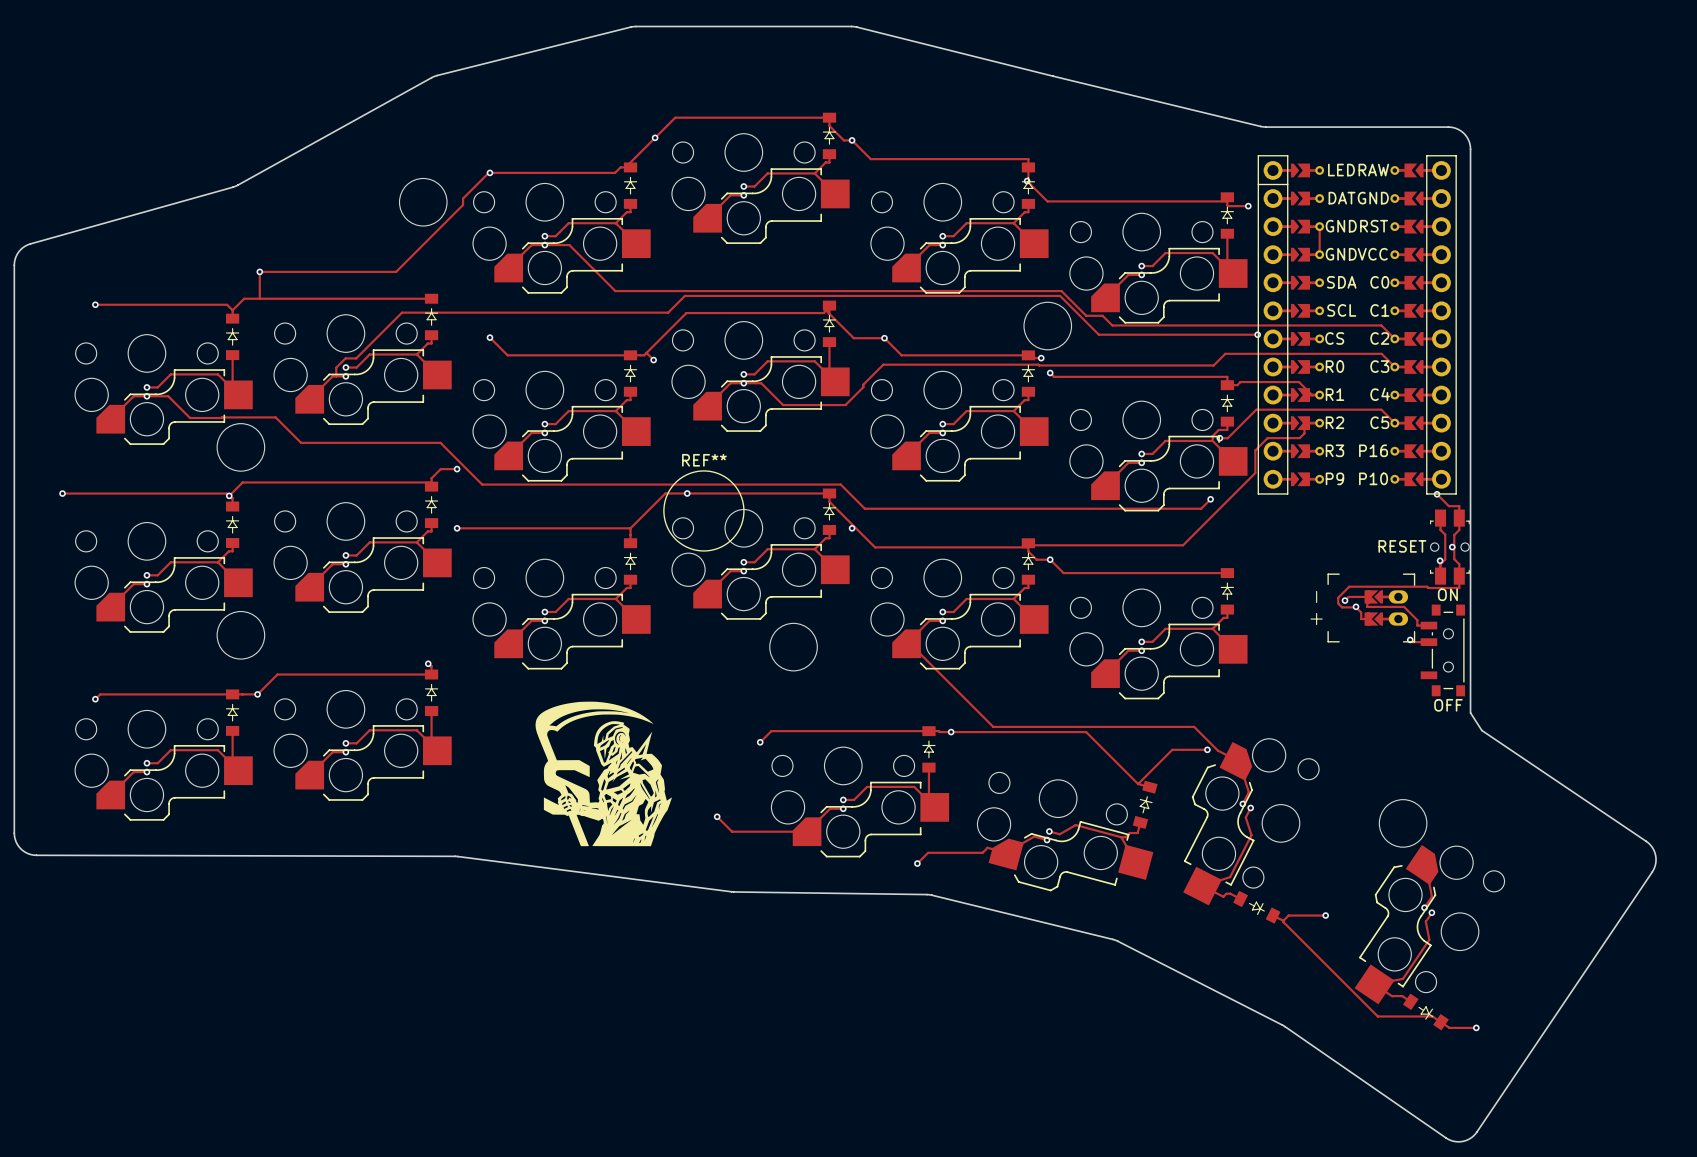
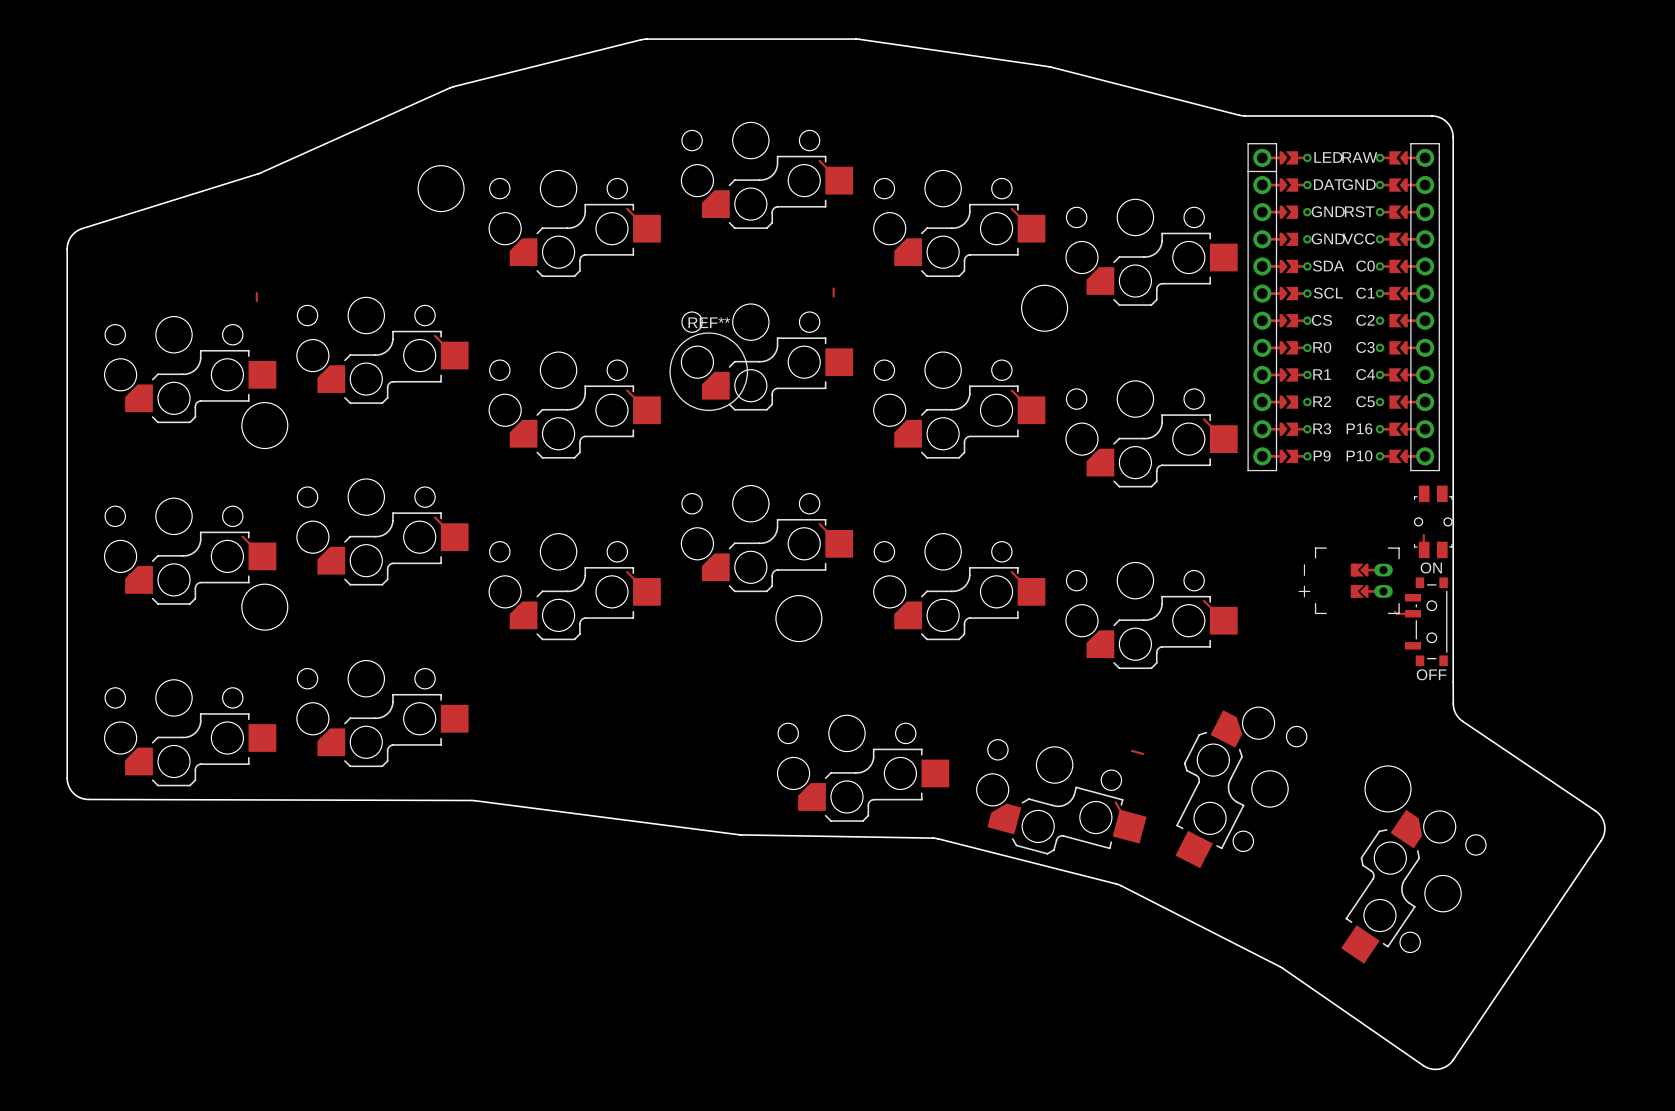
board edge: (1265, 127) (854, 26) (633, 26) (434, 76) (235, 186) (25, 246) (17, 254) (14, 265) (14, 833) (15, 841) (22, 850) (36, 855) (456, 856) (732, 891) (931, 895) (1117, 941) (1283, 1025) (1445, 1137) (1460, 1141) (1469, 1138) (1476, 1132) (1652, 872) (1656, 860) (1654, 850) (1648, 842) (1481, 730) (1470, 712) -> (1255, 115) (1239, 115) (1049, 66) (859, 39) (644, 39) (451, 87) (259, 173) (77, 230) (69, 238) (67, 248) (67, 778) (68, 786) (77, 796) (88, 799) (473, 800) (740, 834) (937, 838) (1120, 885) (1281, 967) (1423, 1065) (1437, 1069) (1446, 1066) (1453, 1059) (1601, 840) (1604, 829) (1603, 819) (1597, 812) (1460, 719) (1453, 708) (1453, 682)
part: (829, 135) -> none
via: (655, 137) -> none
via: (852, 140) -> none
track: (829, 154) (829, 162) (825, 162) (814, 173) (767, 173) (754, 186) (743, 186) -> none
track: (625, 167) (675, 117) (829, 117) (829, 125) (843, 140) (852, 140) (870, 159) (1028, 159) (1027, 181) (1047, 201) (1227, 201) -> none
track: (630, 167) (620, 167) (615, 172) (488, 172) (463, 198) (463, 204) (396, 271) (259, 271) (259, 298) -> none
via: (489, 172) -> none
via: (1027, 181) -> none
part: (630, 185) -> none
part: (1028, 185) -> none
via: (743, 186) -> none
track: (743, 195) (730, 195) (707, 218) -> none
via: (743, 195) -> none
track: (1227, 197) (1227, 206) (1248, 206) -> none
track: (630, 203) (630, 212) (626, 212) (615, 223) (568, 223) (555, 236) (544, 236) -> none
track: (1028, 203) (1028, 212) (1024, 212) (1013, 223) (966, 223) (953, 236) (942, 236) -> none
via: (1248, 206) -> none
part: (1227, 215) -> none
track: (1304, 226) (1319, 226) (1319, 254) (1304, 254) -> none
track: (1227, 233) (1227, 263) (1225, 265) -> none
via: (544, 236) -> none
via: (942, 236) -> none
via: (544, 245) -> none
track: (942, 245) (929, 245) (906, 268) -> none
via: (942, 245) -> none
track: (1141, 266) (1152, 266) (1165, 253) (1212, 253) (1233, 273) -> none
via: (1141, 266) -> none
track: (508, 268) (531, 245) (569, 245) (615, 291) (1061, 291) (1086, 315) (1102, 315) (1112, 325) (1381, 325) (1394, 338) (1410, 338) -> none
via: (259, 271) -> none
track: (1141, 274) (1128, 274) (1105, 297) -> none
via: (1141, 274) -> none
track: (431, 298) (244, 298) (232, 310) (227, 304) (95, 304) -> none
via: (95, 304) -> none
part: (431, 316) -> none
part: (829, 323) -> none
track: (1257, 334) (1098, 334) (1060, 295) (684, 295) (668, 312) (402, 312) (356, 358) (345, 358) (336, 367) (336, 376) -> none
via: (1257, 334) -> none
track: (431, 335) (431, 343) (427, 343) (416, 354) (369, 354) (356, 367) (345, 367) -> none
part: (232, 336) -> none
track: (489, 337) (507, 355) (644, 355) (686, 313) (823, 313) (826, 310) (853, 338) (884, 338) (901, 355) (1028, 355) (1031, 358) (1041, 358) -> none
via: (489, 337) -> none
via: (884, 338) -> none
track: (829, 342) (829, 371) (827, 373) -> none
track: (646, 352) (653, 360) -> none
track: (232, 355) (232, 384) (230, 386) -> none
via: (1041, 358) -> none
via: (653, 360) -> none
track: (1410, 366) (1394, 366) (1381, 353) (1225, 353) (1213, 365) (883, 364) (845, 405) (783, 405) (761, 383) (730, 383) (707, 406) -> none
via: (345, 367) -> none
track: (1050, 372) (1054, 376) (1227, 376) (1227, 385) (1237, 385) (1240, 382) (1299, 382) (1312, 395) -> none
via: (1050, 372) -> none
part: (630, 373) -> none
part: (1028, 373) -> none
track: (743, 374) (754, 374) (767, 361) (814, 361) (835, 381) -> none
via: (743, 374) -> none
track: (345, 376) (332, 376) (309, 399) -> none
via: (345, 376) -> none
via: (743, 383) -> none
track: (146, 387) (157, 387) (170, 374) (217, 374) (238, 394) -> none
via: (146, 387) -> none
track: (630, 391) (630, 400) (626, 400) (615, 411) (568, 411) (555, 424) (544, 424) -> none
track: (1028, 391) (1028, 400) (1024, 400) (1013, 411) (966, 411) (953, 424) (942, 424) -> none
via: (146, 396) -> none
part: (1227, 403) -> none
track: (110, 419) (133, 396) (168, 396) (190, 418) (275, 417) (301, 442) (440, 442) (482, 484) (840, 484) (864, 508) (1201, 508) (1210, 499) -> none
track: (1227, 421) (1227, 429) (1218, 429) (1212, 436) (1212, 440) (1165, 440) (1152, 453) (1141, 453) -> none
track: (1319, 423) (1304, 423) (1304, 433) (1299, 438) (1267, 438) (1255, 450) (1255, 473) (1183, 545) (1028, 545) -> none
track: (1410, 423) (1394, 423) (1381, 409) (1256, 409) (1227, 438) (1219, 438) -> none
via: (544, 424) -> none
via: (942, 424) -> none
track: (544, 432) (531, 432) (508, 455) -> none
via: (544, 432) -> none
track: (942, 432) (929, 432) (906, 455) -> none
via: (942, 432) -> none
via: (1219, 438) -> none
via: (1141, 453) -> none
track: (1141, 462) (1128, 462) (1105, 485) -> none
via: (1141, 462) -> none
track: (457, 469) (440, 469) (431, 478) (431, 486) -> none
via: (457, 469) -> none
track: (431, 482) (242, 482) (229, 495) -> none
track: (62, 493) (226, 493) (232, 498) (232, 506) -> none
via: (62, 493) -> none
via: (687, 493) -> none
track: (1437, 494) (1448, 506) (1459, 506) (1459, 529) (1454, 535) (1454, 559) (1459, 564) (1459, 588) (1349, 586) (1338, 597) (1338, 603) (1342, 607) (1356, 607) -> none
via: (1437, 494) -> none
via: (229, 495) -> none
via: (1210, 499) -> none
part: (431, 504) -> none
REF** position: (703, 510) -> (708, 371)
part: (829, 511) -> none
track: (1440, 518) (1440, 529) (1445, 534) (1445, 559) (1440, 564) (1440, 576) -> none
track: (431, 523) (431, 531) (427, 531) (416, 542) (369, 542) (356, 555) (345, 555) -> none
part: (232, 524) -> none
track: (457, 528) (630, 528) -> none
via: (457, 528) -> none
track: (630, 528) (630, 543) -> none
track: (630, 528) (665, 493) (829, 493) (829, 501) (875, 547) (1028, 547) -> none
via: (852, 528) -> none
track: (829, 529) (829, 538) (825, 538) (814, 549) (767, 549) (754, 562) (743, 562) -> none
track: (232, 543) (232, 551) (228, 551) (217, 562) (170, 562) (157, 575) (146, 575) -> none
track: (1028, 543) (1028, 551) (1036, 559) (1050, 559) (1063, 573) (1227, 573) -> none
part text: RESET (1402, 546) -> none
via: (1452, 547) -> none
via: (345, 555) -> none
via: (1050, 559) -> none
via: (1440, 560) -> none
part: (630, 561) -> none
part: (1028, 561) -> none
via: (743, 562) -> none
track: (345, 564) (332, 564) (309, 587) -> none
via: (345, 564) -> none
track: (743, 571) (730, 571) (707, 594) -> none
via: (743, 571) -> none
via: (146, 575) -> none
track: (630, 579) (630, 588) (626, 588) (615, 598) (568, 598) (555, 612) (544, 612) -> none
track: (1028, 579) (1028, 588) (1024, 588) (1013, 598) (966, 598) (953, 612) (942, 612) -> none
track: (146, 584) (133, 584) (110, 607) -> none
via: (146, 584) -> none
part: (1227, 591) -> none
track: (1344, 600) (1348, 596) (1367, 596) (1367, 606) (1404, 606) (1417, 620) (1417, 625) (1428, 625) -> none
via: (1344, 600) -> none
via: (1356, 606) -> none
track: (1356, 607) (1361, 612) (1361, 619) (1367, 619) -> none
track: (1227, 609) (1227, 617) (1223, 617) (1212, 628) (1165, 628) (1152, 641) (1141, 641) -> none
via: (544, 612) -> none
via: (942, 612) -> none
track: (544, 620) (531, 620) (508, 643) -> none
via: (544, 620) -> none
track: (942, 620) (929, 620) (906, 643) -> none
via: (942, 620) -> none
via: (1410, 639) -> none
track: (908, 641) (993, 726) (1194, 726) (1217, 750) (1238, 761) -> none
via: (1141, 641) -> none
track: (1141, 650) (1128, 650) (1105, 673) -> none
via: (1141, 650) -> none
track: (428, 663) (431, 666) (431, 674) (277, 674) (257, 694) (100, 694) (95, 699) -> none
via: (428, 663) -> none
part: (431, 692) -> none
via: (257, 694) -> none
via: (95, 699) -> none
drawing: [535, 701, 672, 847] -> none
track: (431, 711) (431, 740) (429, 742) -> none
part: (232, 712) -> none
track: (232, 730) (232, 760) (230, 762) -> none
via: (951, 732) -> none
track: (760, 742) (771, 731) (1086, 732) (1138, 784) (1172, 749) (1207, 749) -> none
via: (760, 742) -> none
track: (345, 743) (356, 743) (369, 730) (416, 730) (437, 750) -> none
via: (345, 743) -> none
part: (928, 749) -> none
via: (1207, 749) -> none
track: (345, 752) (332, 752) (309, 775) -> none
via: (345, 752) -> none
track: (1238, 761) (1248, 792) (1242, 803) -> none
track: (146, 763) (157, 763) (170, 750) (217, 750) (238, 770) -> none
via: (146, 763) -> none
track: (928, 767) (928, 796) (926, 799) -> none
track: (146, 772) (133, 772) (110, 795) -> none
via: (146, 772) -> none
track: (843, 799) (854, 799) (867, 786) (914, 786) (934, 807) -> none
via: (843, 799) -> none
via: (1242, 803) -> none
part: (1145, 804) -> none
track: (1250, 807) (1245, 817) (1251, 835) (1230, 877) (1202, 886) -> none
via: (1250, 807) -> none
track: (843, 808) (830, 808) (807, 831) (732, 831) (717, 816) -> none
via: (843, 808) -> none
via: (717, 816) -> none
track: (1140, 822) (1137, 833) (1129, 833) (1125, 837) (1075, 825) (1059, 834) (1049, 831) -> none
via: (1049, 831) -> none
track: (1047, 840) (1034, 836) (1006, 852) (987, 847) (982, 852) (928, 852) (917, 863) -> none
via: (1047, 840) -> none
via: (917, 863) -> none
track: (1425, 864) (1431, 896) (1424, 907) -> none
track: (1202, 886) (1223, 896) (1226, 893) (1230, 893) (1240, 898) -> none
part: (1256, 907) -> none
via: (1424, 907) -> none
track: (1431, 912) (1425, 921) (1429, 939) (1402, 978) (1374, 984) (1392, 996) -> none
via: (1431, 912) -> none
track: (1273, 915) (1283, 920) -> none
track: (1325, 915) (1288, 915) (1283, 920) -> none
via: (1325, 915) -> none
track: (1283, 920) (1377, 1016) (1432, 1016) (1449, 1027) (1476, 1027) -> none
track: (1392, 996) (1402, 996) (1410, 1001) -> none
part: (1425, 1012) -> none
via: (1476, 1027) -> none

